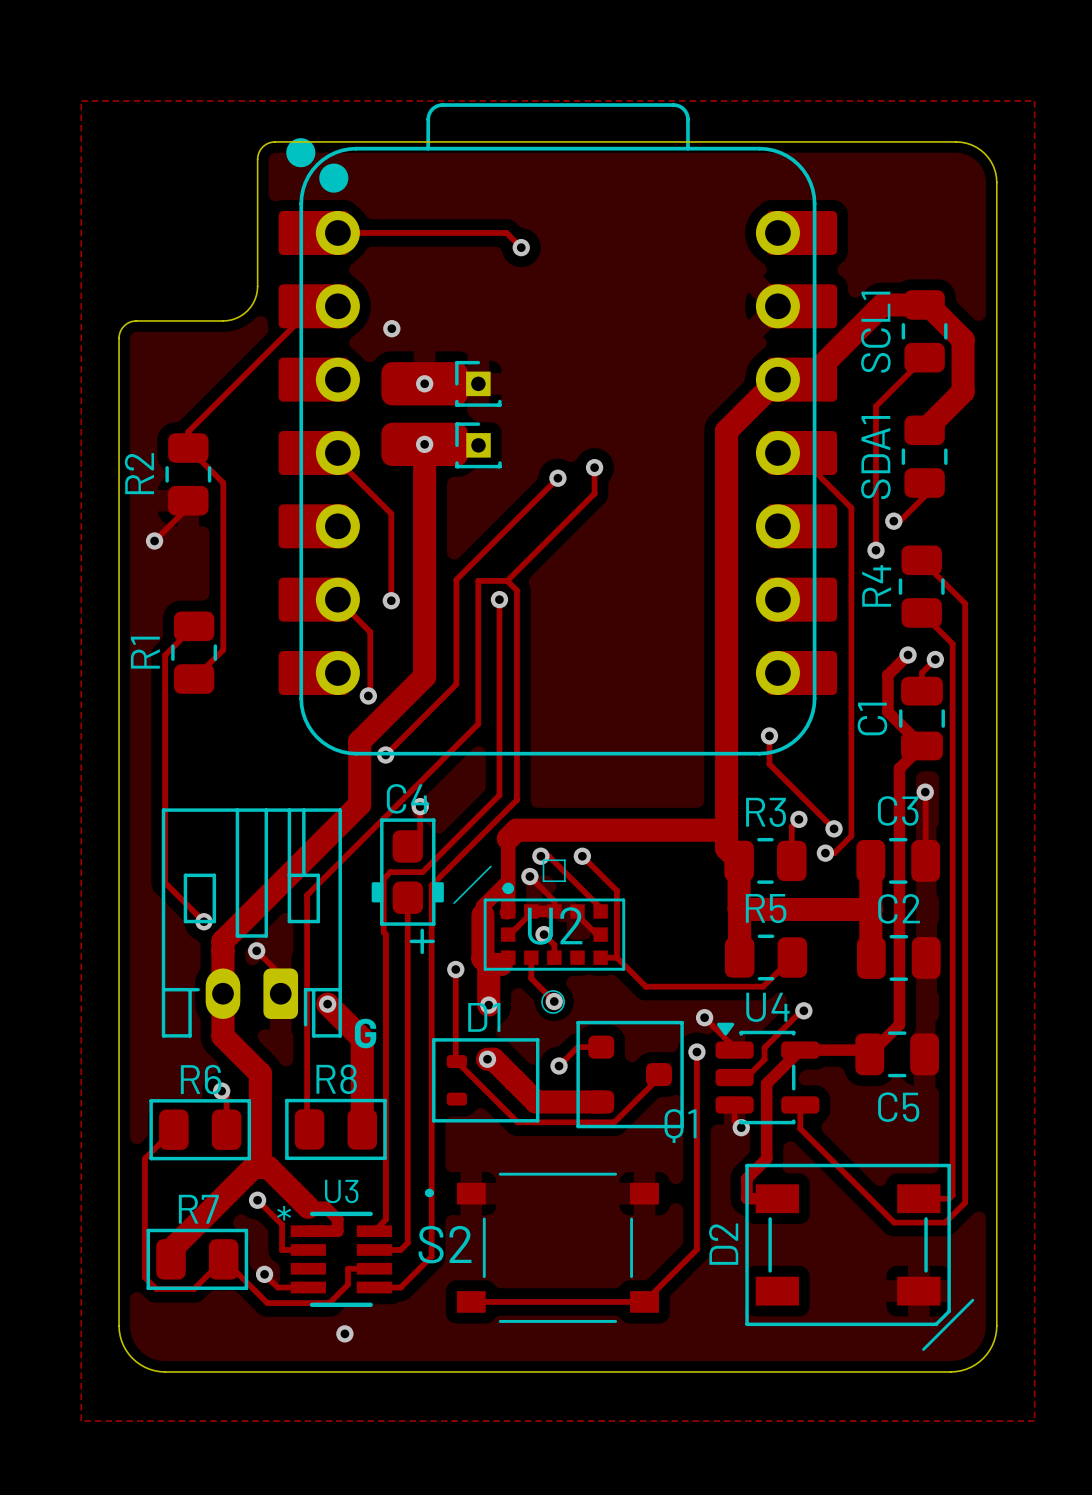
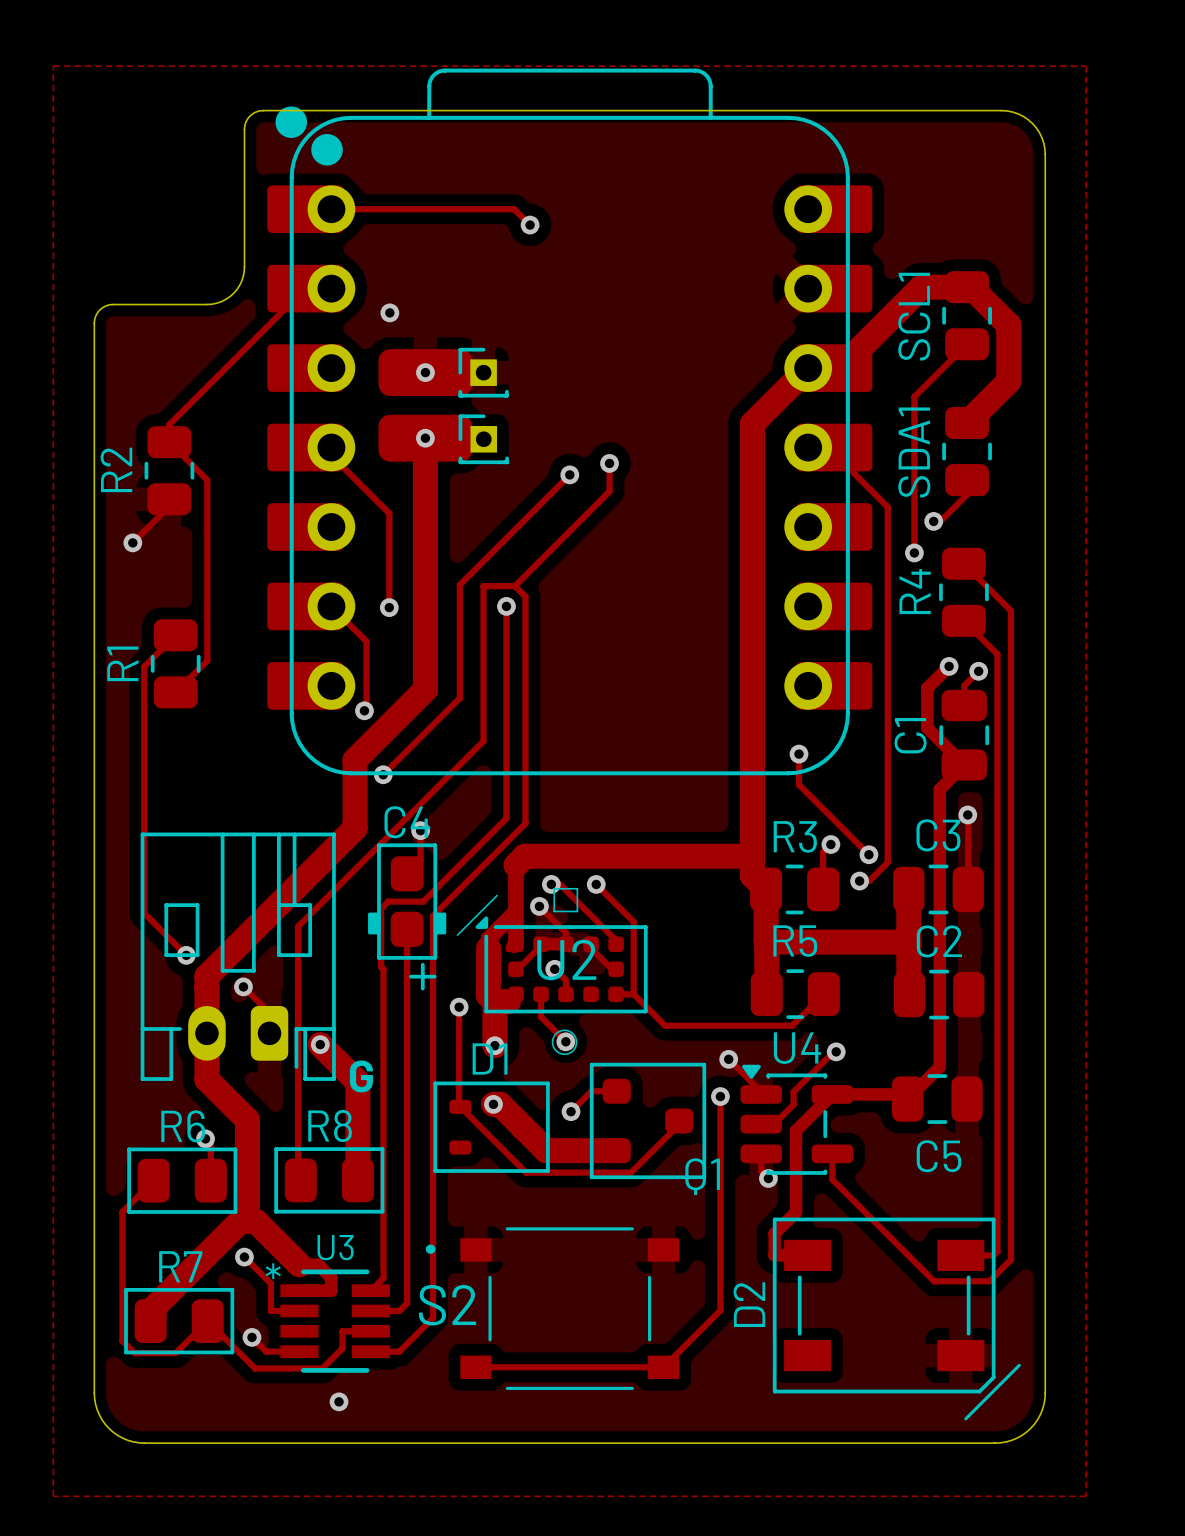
U2 footprint: [483, 882, 626, 971] -> [475, 916, 648, 1014]

